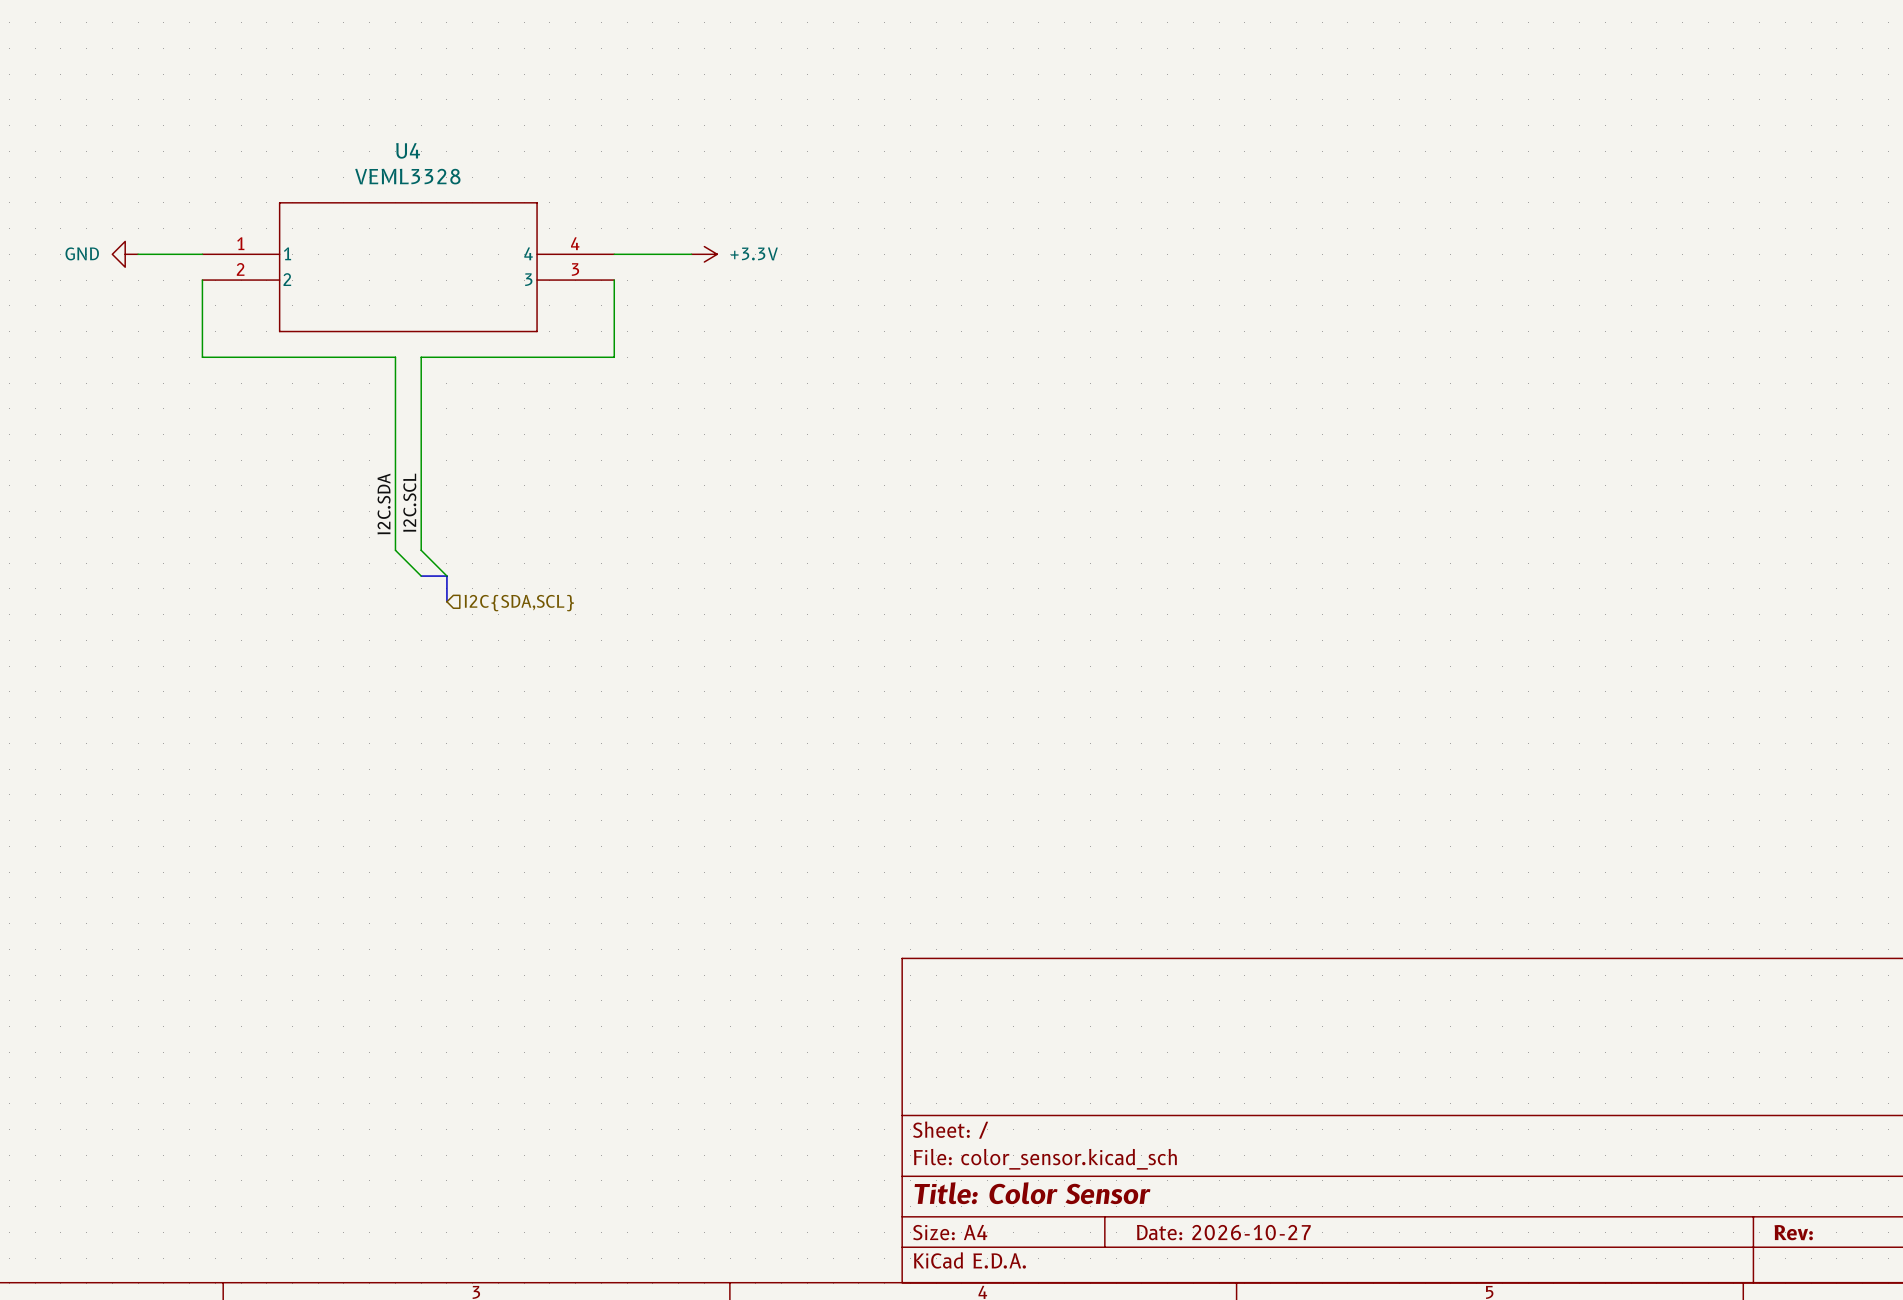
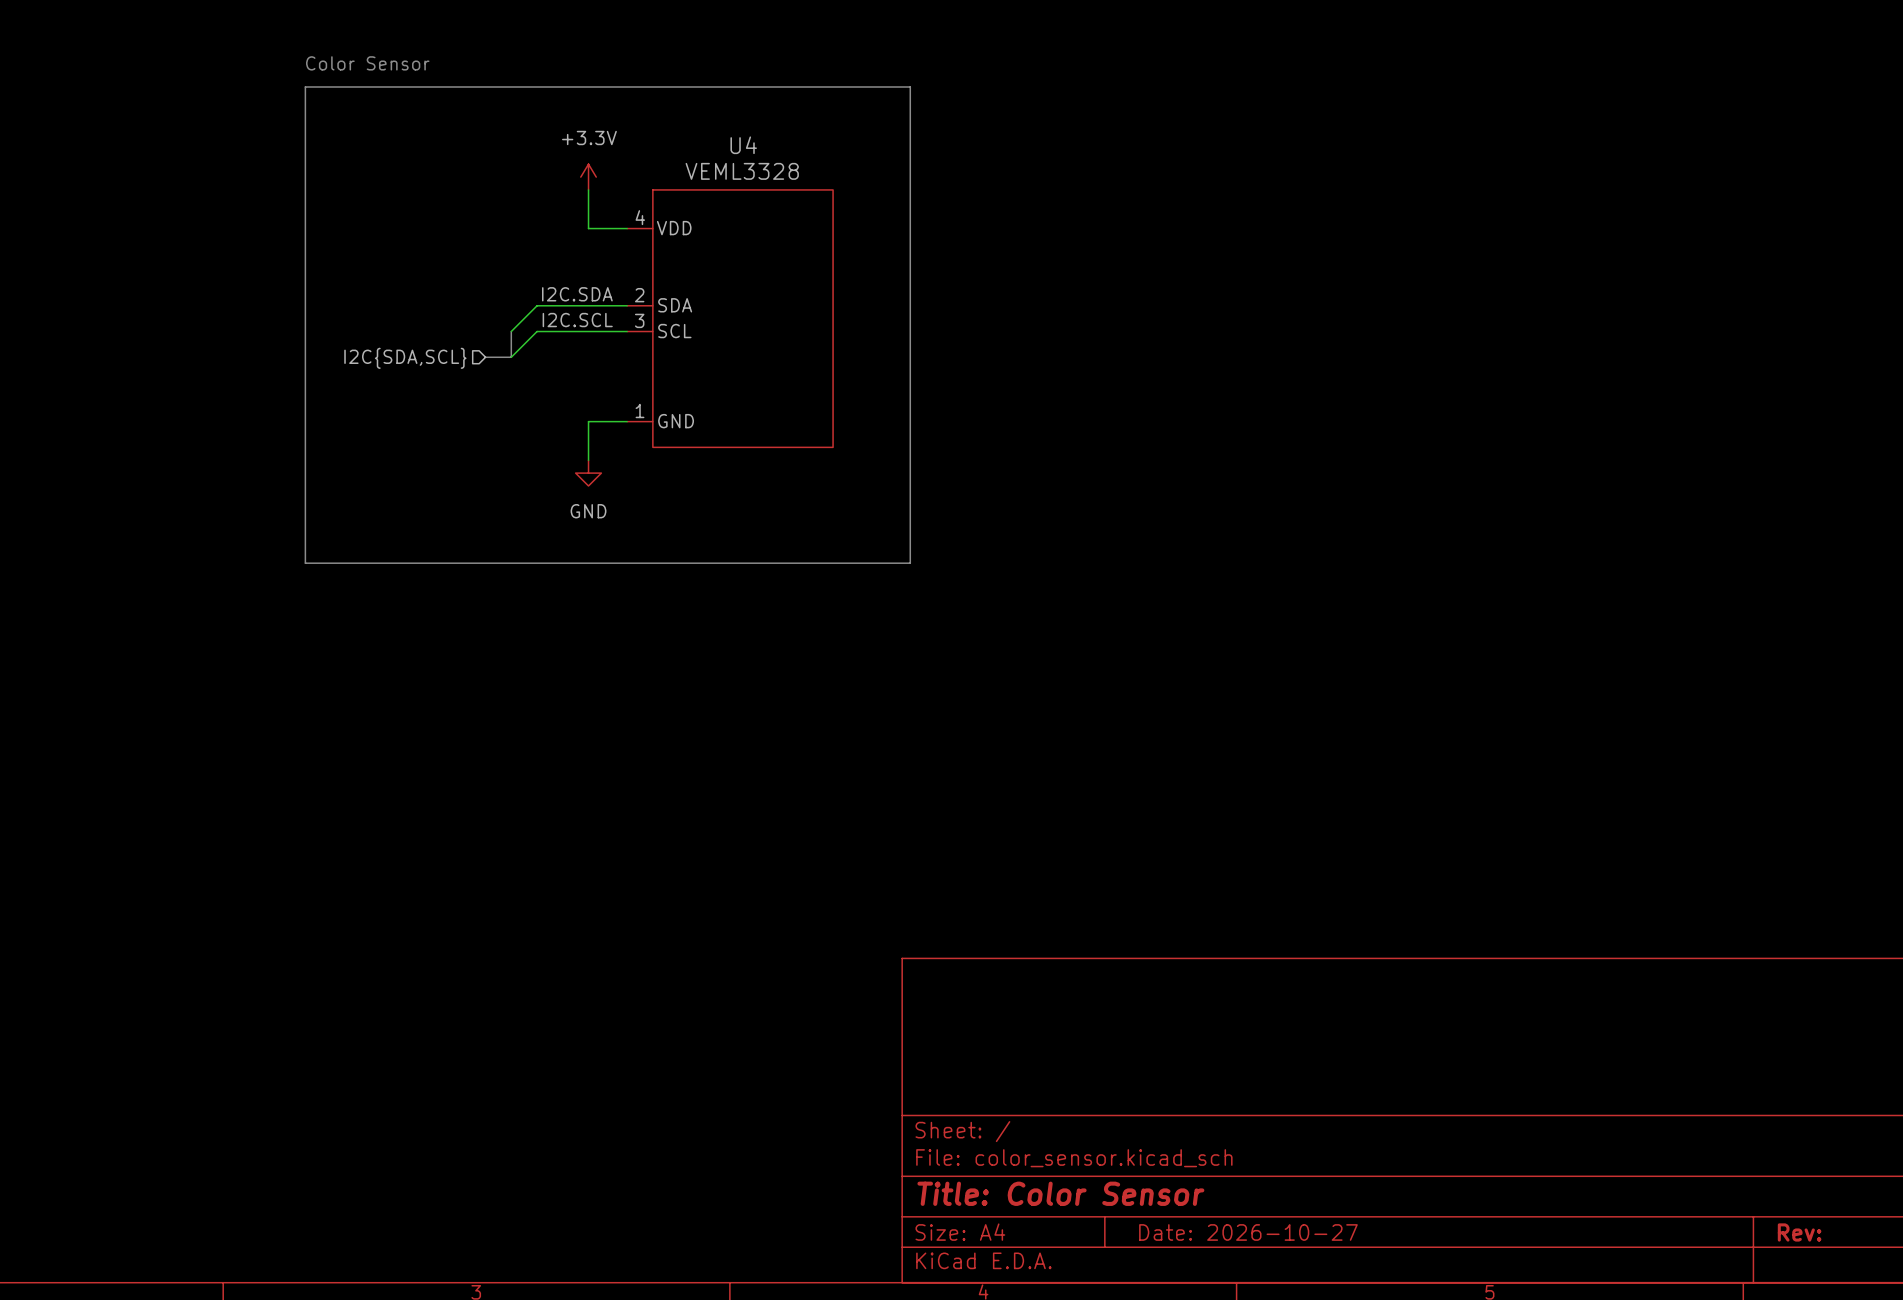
text: none -> Color Sensor (367, 63)
line: none -> (305, 86) (910, 86) (910, 563) (305, 563) (305, 86)
U4 name position: U4 (408, 150) -> U4 (743, 145)
U4 value position: VEML3328 (407, 176) -> VEML3328 (742, 171)
wire: none -> (588, 189) (588, 228) (627, 228)
U4 symbol: [202, 202, 615, 333] -> [627, 189, 834, 448]
power symbol text position: +3.3V (754, 253) -> +3.3V (589, 137)
power symbol: GND (125, 254) -> none
wire: (138, 254) (202, 254) -> none
wire: (614, 254) (691, 254) -> none
power symbol rotation: 0° (704, 254) -> 90° counterclockwise (588, 177)
power symbol position: +3.3V (704, 254) -> +3.3V (588, 177)
wire: (202, 280) (202, 357) (395, 357) (395, 550) (421, 576) -> none
wire: (614, 280) (614, 357) (421, 357) (421, 550) (446, 576) -> none
label: none -> I2C.SDA (577, 294)
wire: none -> (627, 305) (537, 305) (511, 331)
bus: none -> (511, 331) (511, 357) (485, 357)
wire: none -> (627, 331) (537, 331) (511, 357)
wire: none -> (627, 421) (588, 421) (588, 460)
power symbol: none -> GND (588, 473)
label rotation: 0° (409, 502) -> 90° clockwise (577, 320)
label position: I2C.SCL (409, 502) -> I2C.SCL (577, 320)
label: I2C.SDA (384, 504) -> none
bus: (421, 576) (446, 576) (446, 601) -> none
hierarchical label rotation: 0° (519, 603) -> 180° (405, 358)
hierarchical label position: I2C{SDA,SCL} (519, 603) -> I2C{SDA,SCL} (405, 358)

